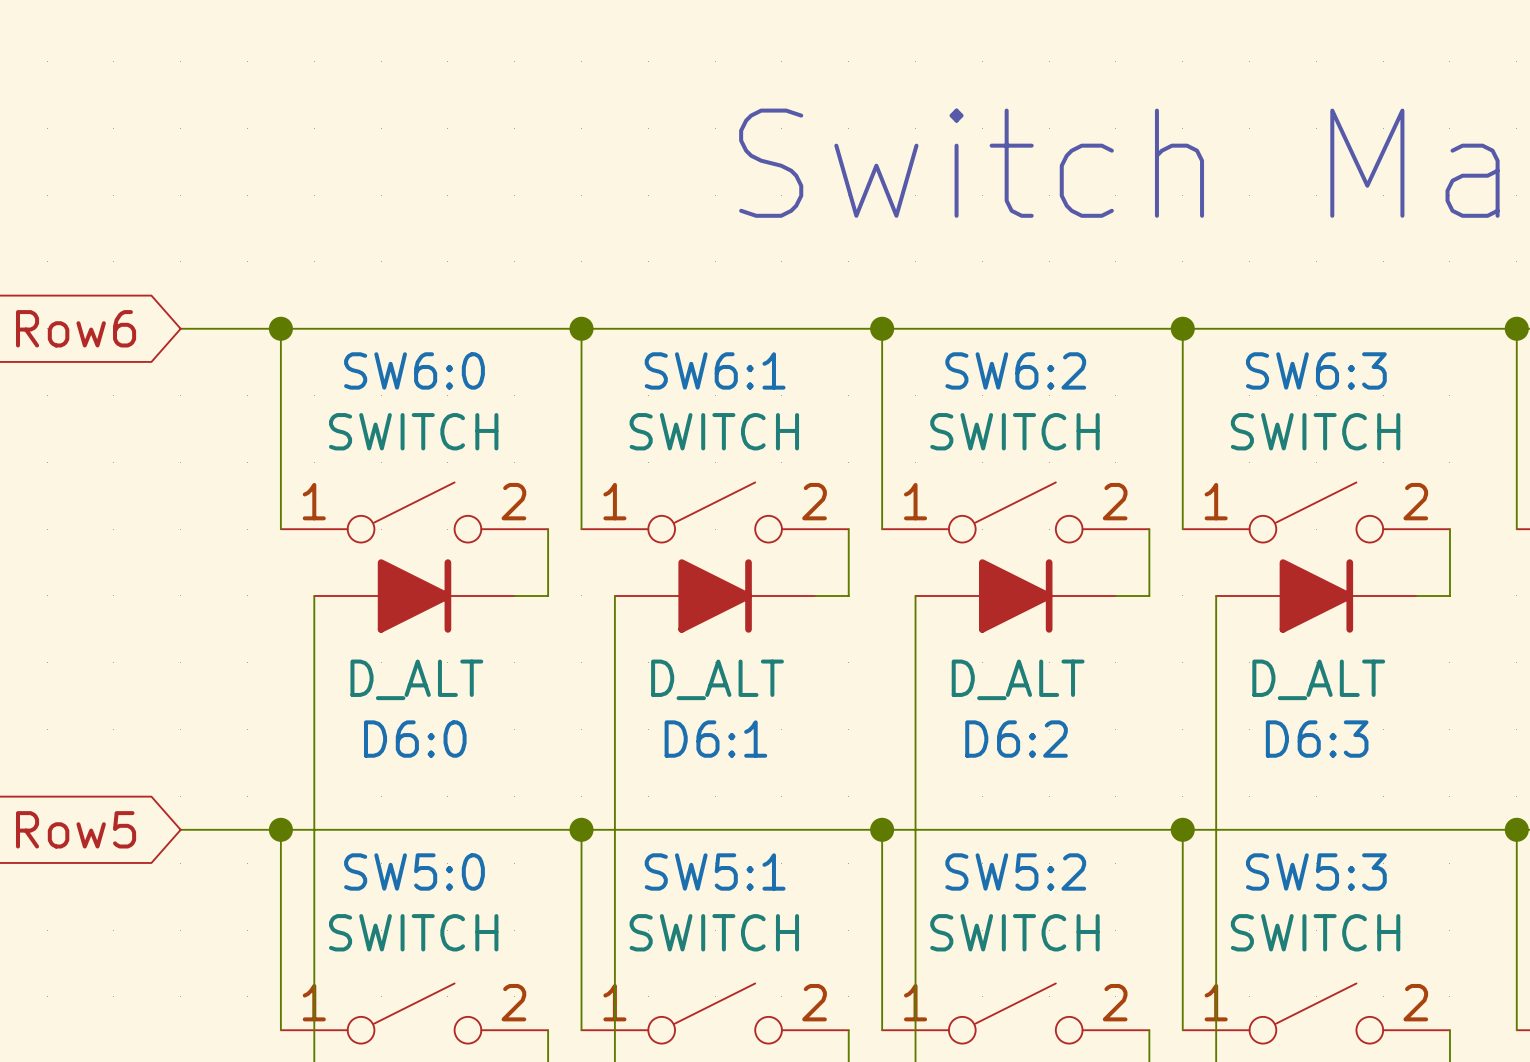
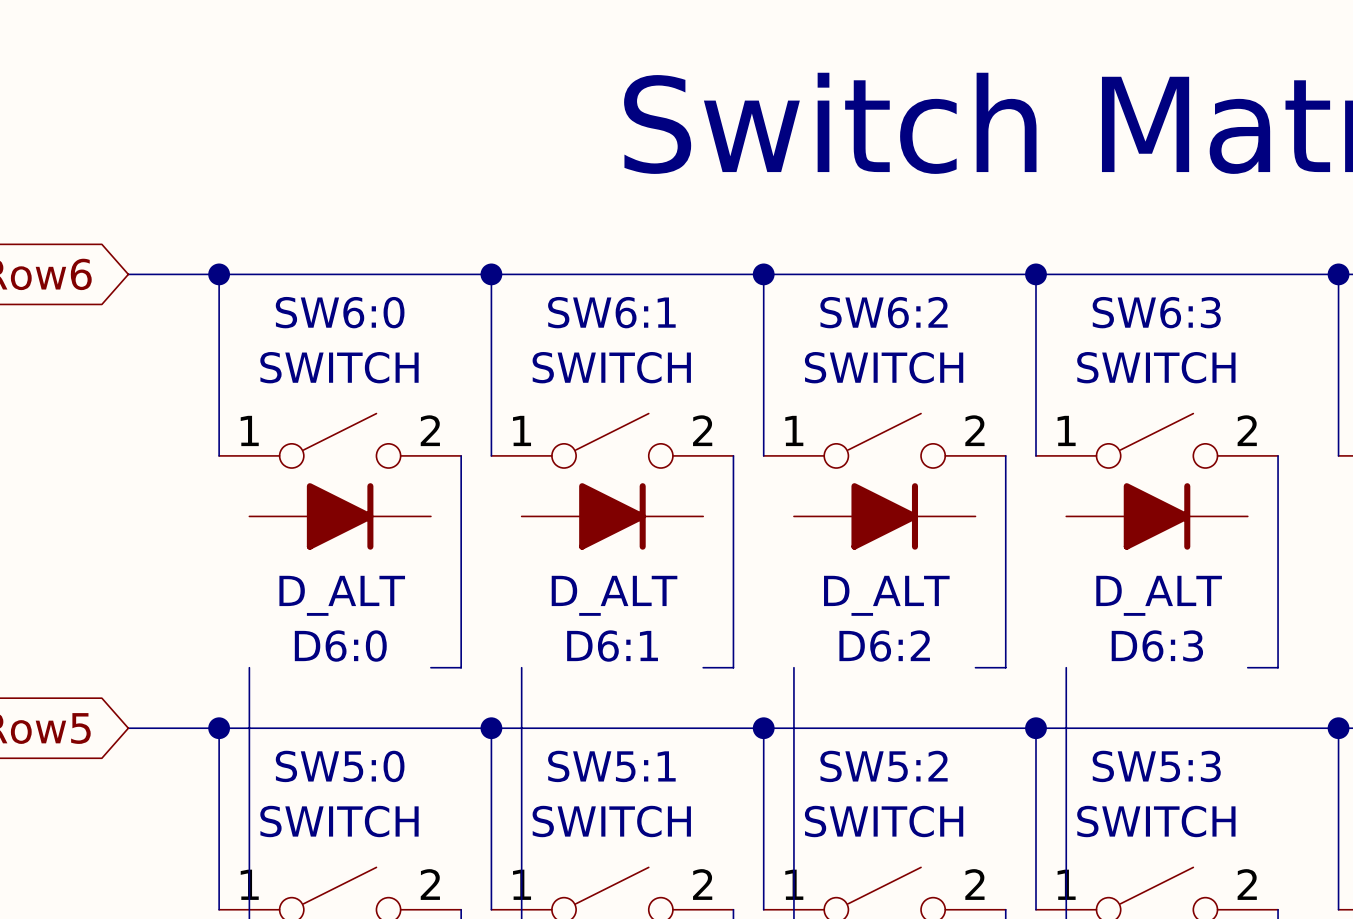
wire: (314, 595) (314, 763) -> none
wire: (514, 595) (548, 595) -> (430, 667) (461, 667) (461, 516)
wire: (614, 595) (614, 763) -> none
wire: (815, 595) (848, 595) -> (703, 667) (733, 667) (733, 516)
wire: (915, 595) (915, 763) -> none
wire: (1115, 595) (1149, 595) -> (975, 667) (1005, 667) (1005, 516)
wire: (1216, 595) (1216, 763) -> none
wire: (1416, 595) (1449, 595) -> (1247, 667) (1278, 667) (1278, 516)

